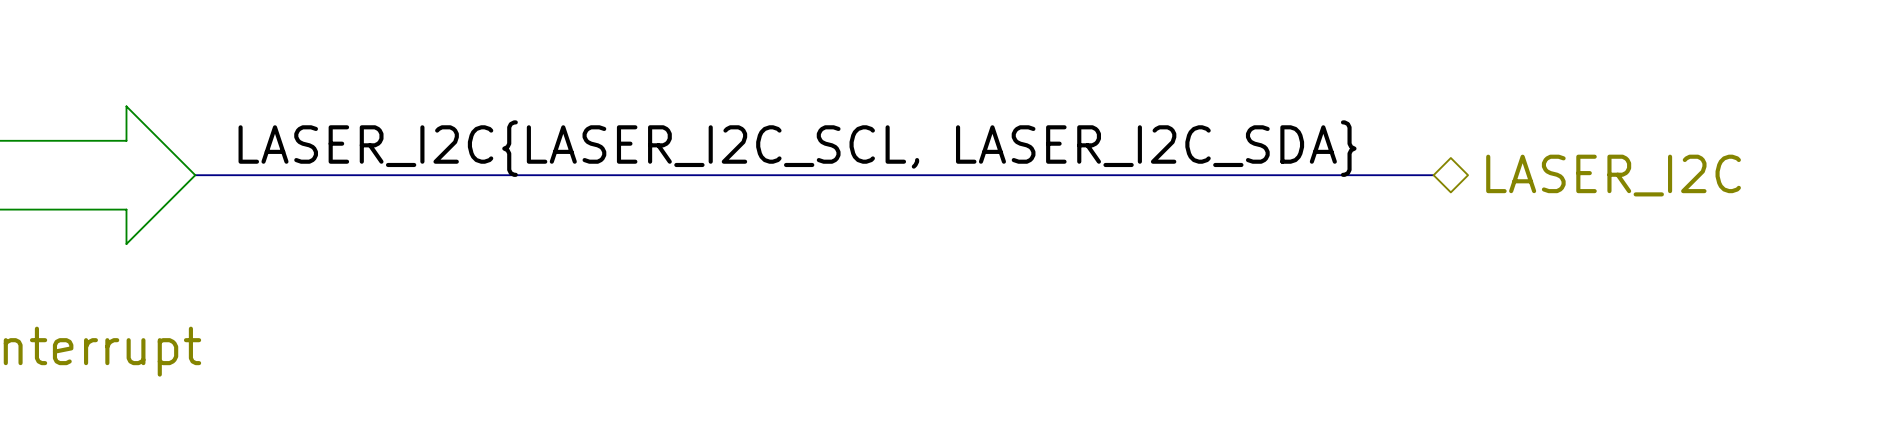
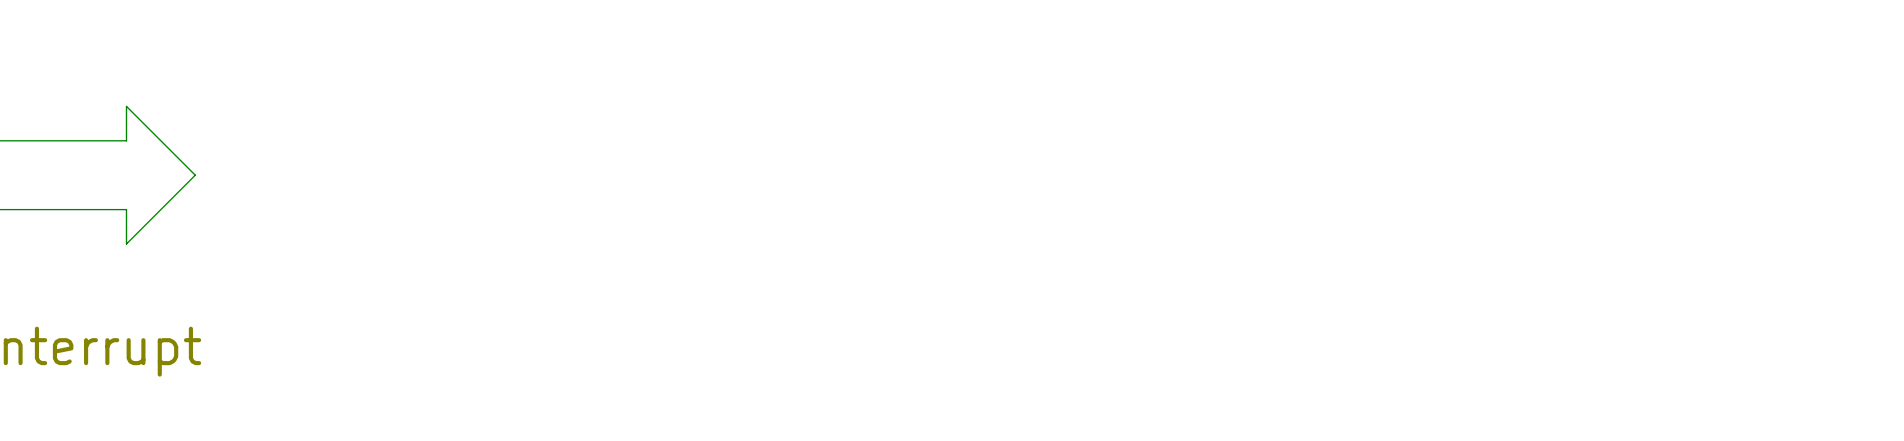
label: LASER_I2C{LASER_I2C_SCL, LASER_I2C_SDA} (797, 148) -> none
bus: (195, 175) (1433, 175) -> none
hierarchical label: LASER_I2C (1613, 175) -> none

